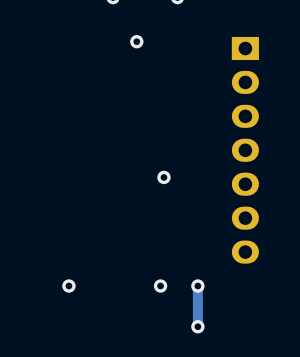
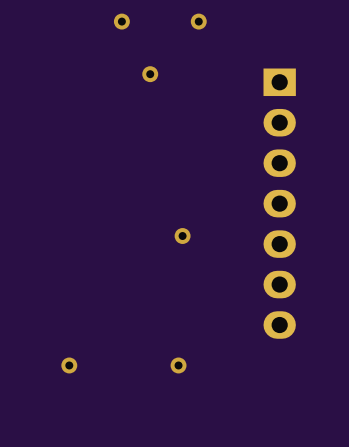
track: (197, 286) (197, 326) -> none
via: (197, 286) -> none
via: (197, 326) -> none

